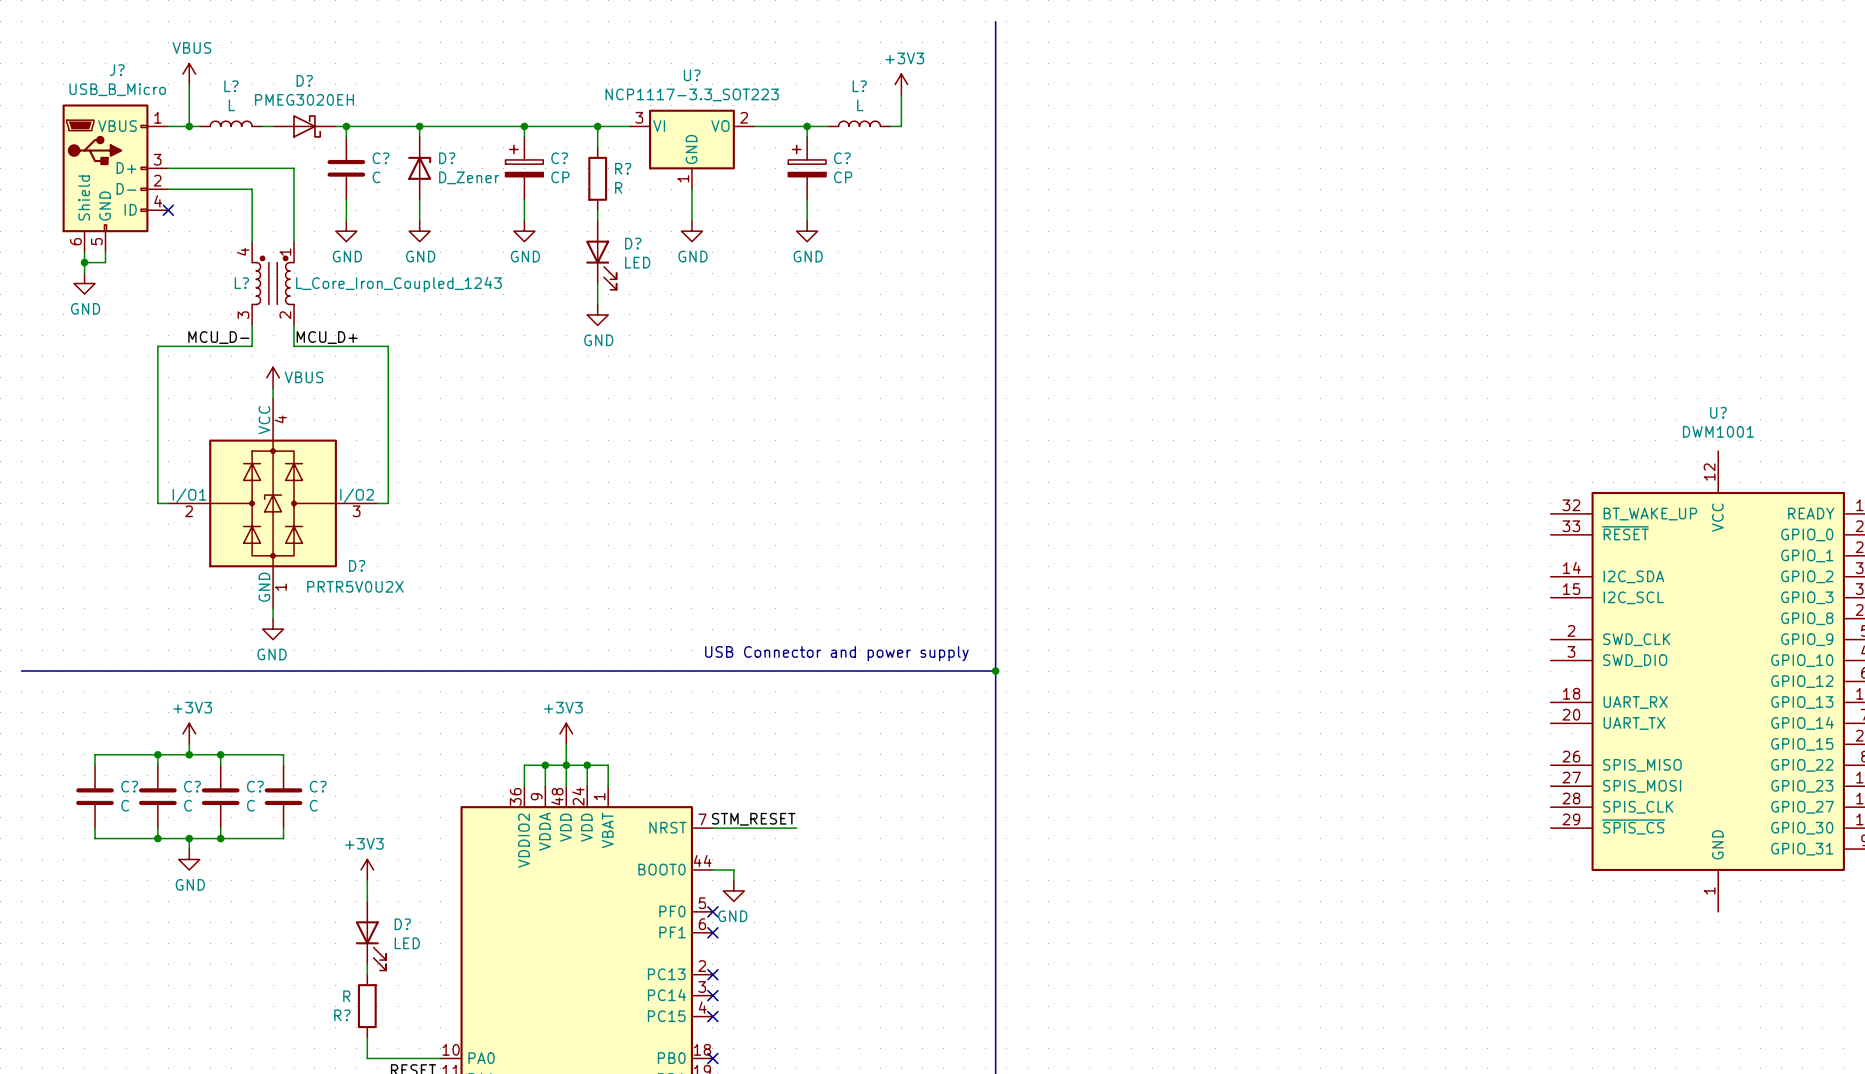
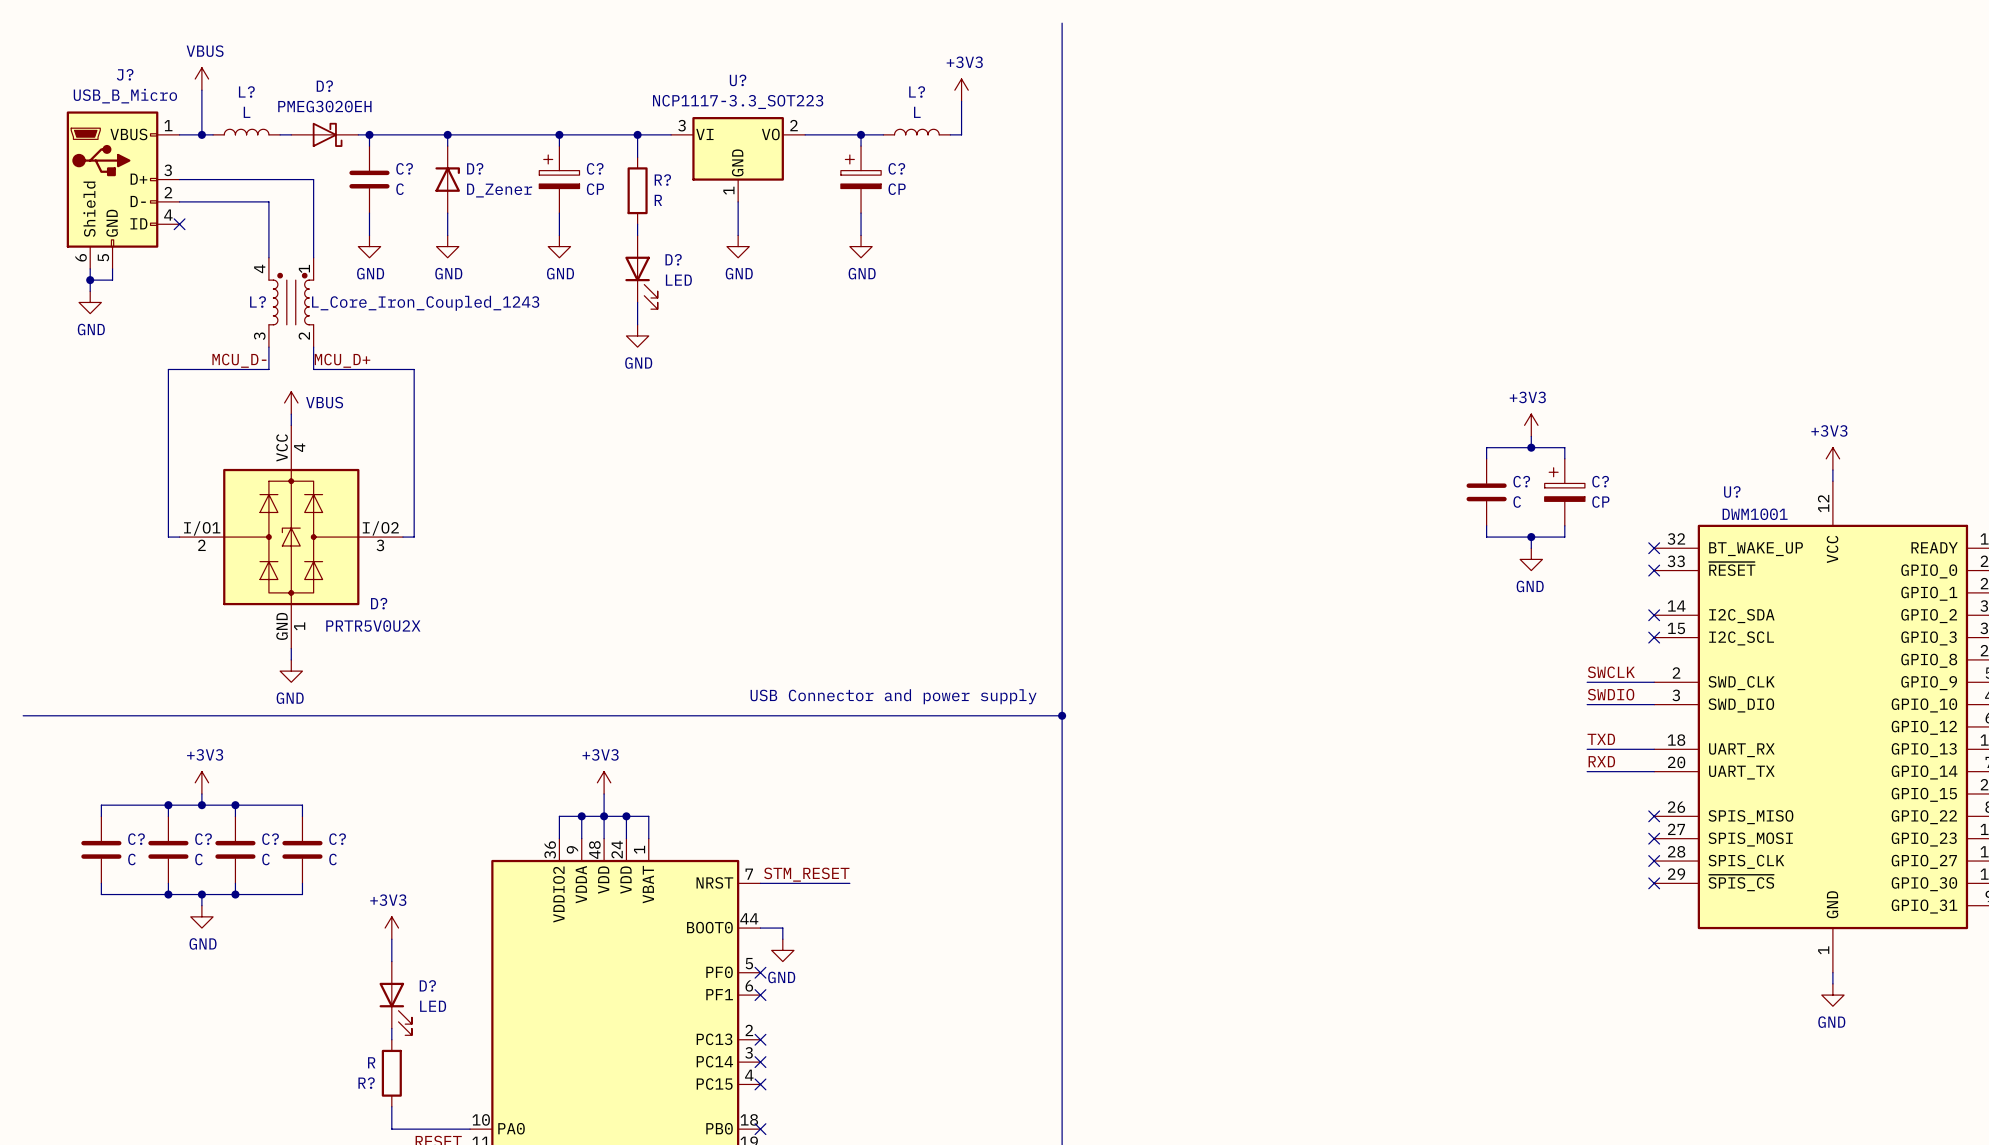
power symbol: none -> +3V3 (1531, 425)
wire: none -> (1531, 436) (1531, 447)
U? name position: U? (1718, 412) -> U? (1732, 491)
junction: none -> (1531, 447)
wire: none -> (1486, 458) (1486, 447) (1564, 447) (1564, 458)
power symbol: none -> +3V3 (1832, 458)
U? value position: DWM1001 (1718, 431) -> DWM1001 (1755, 514)
wire: none -> (1832, 470) (1832, 481)
C?: none -> C (1486, 492)
C?: none -> CP (1564, 492)
wire: none -> (1486, 525) (1486, 537) (1564, 537) (1564, 525)
wire: none -> (1531, 537) (1531, 548)
junction: none -> (1531, 537)
no-connect mark: none -> (1654, 548)
power symbol: none -> GND (1531, 559)
no-connect mark: none -> (1654, 570)
no-connect mark: none -> (1654, 615)
no-connect mark: none -> (1654, 637)
label: none -> SWCLK (1611, 672)
wire: none -> (1587, 682) (1654, 682)
label: none -> SWDIO (1611, 694)
wire: none -> (1587, 704) (1654, 704)
label: none -> TXD (1601, 739)
wire: none -> (1587, 749) (1654, 749)
label: none -> RXD (1601, 761)
wire: none -> (1587, 771) (1654, 771)
no-connect mark: none -> (1654, 816)
no-connect mark: none -> (1654, 838)
no-connect mark: none -> (1654, 861)
no-connect mark: none -> (1654, 883)
wire: none -> (1832, 972) (1832, 983)
power symbol: none -> GND (1832, 995)

